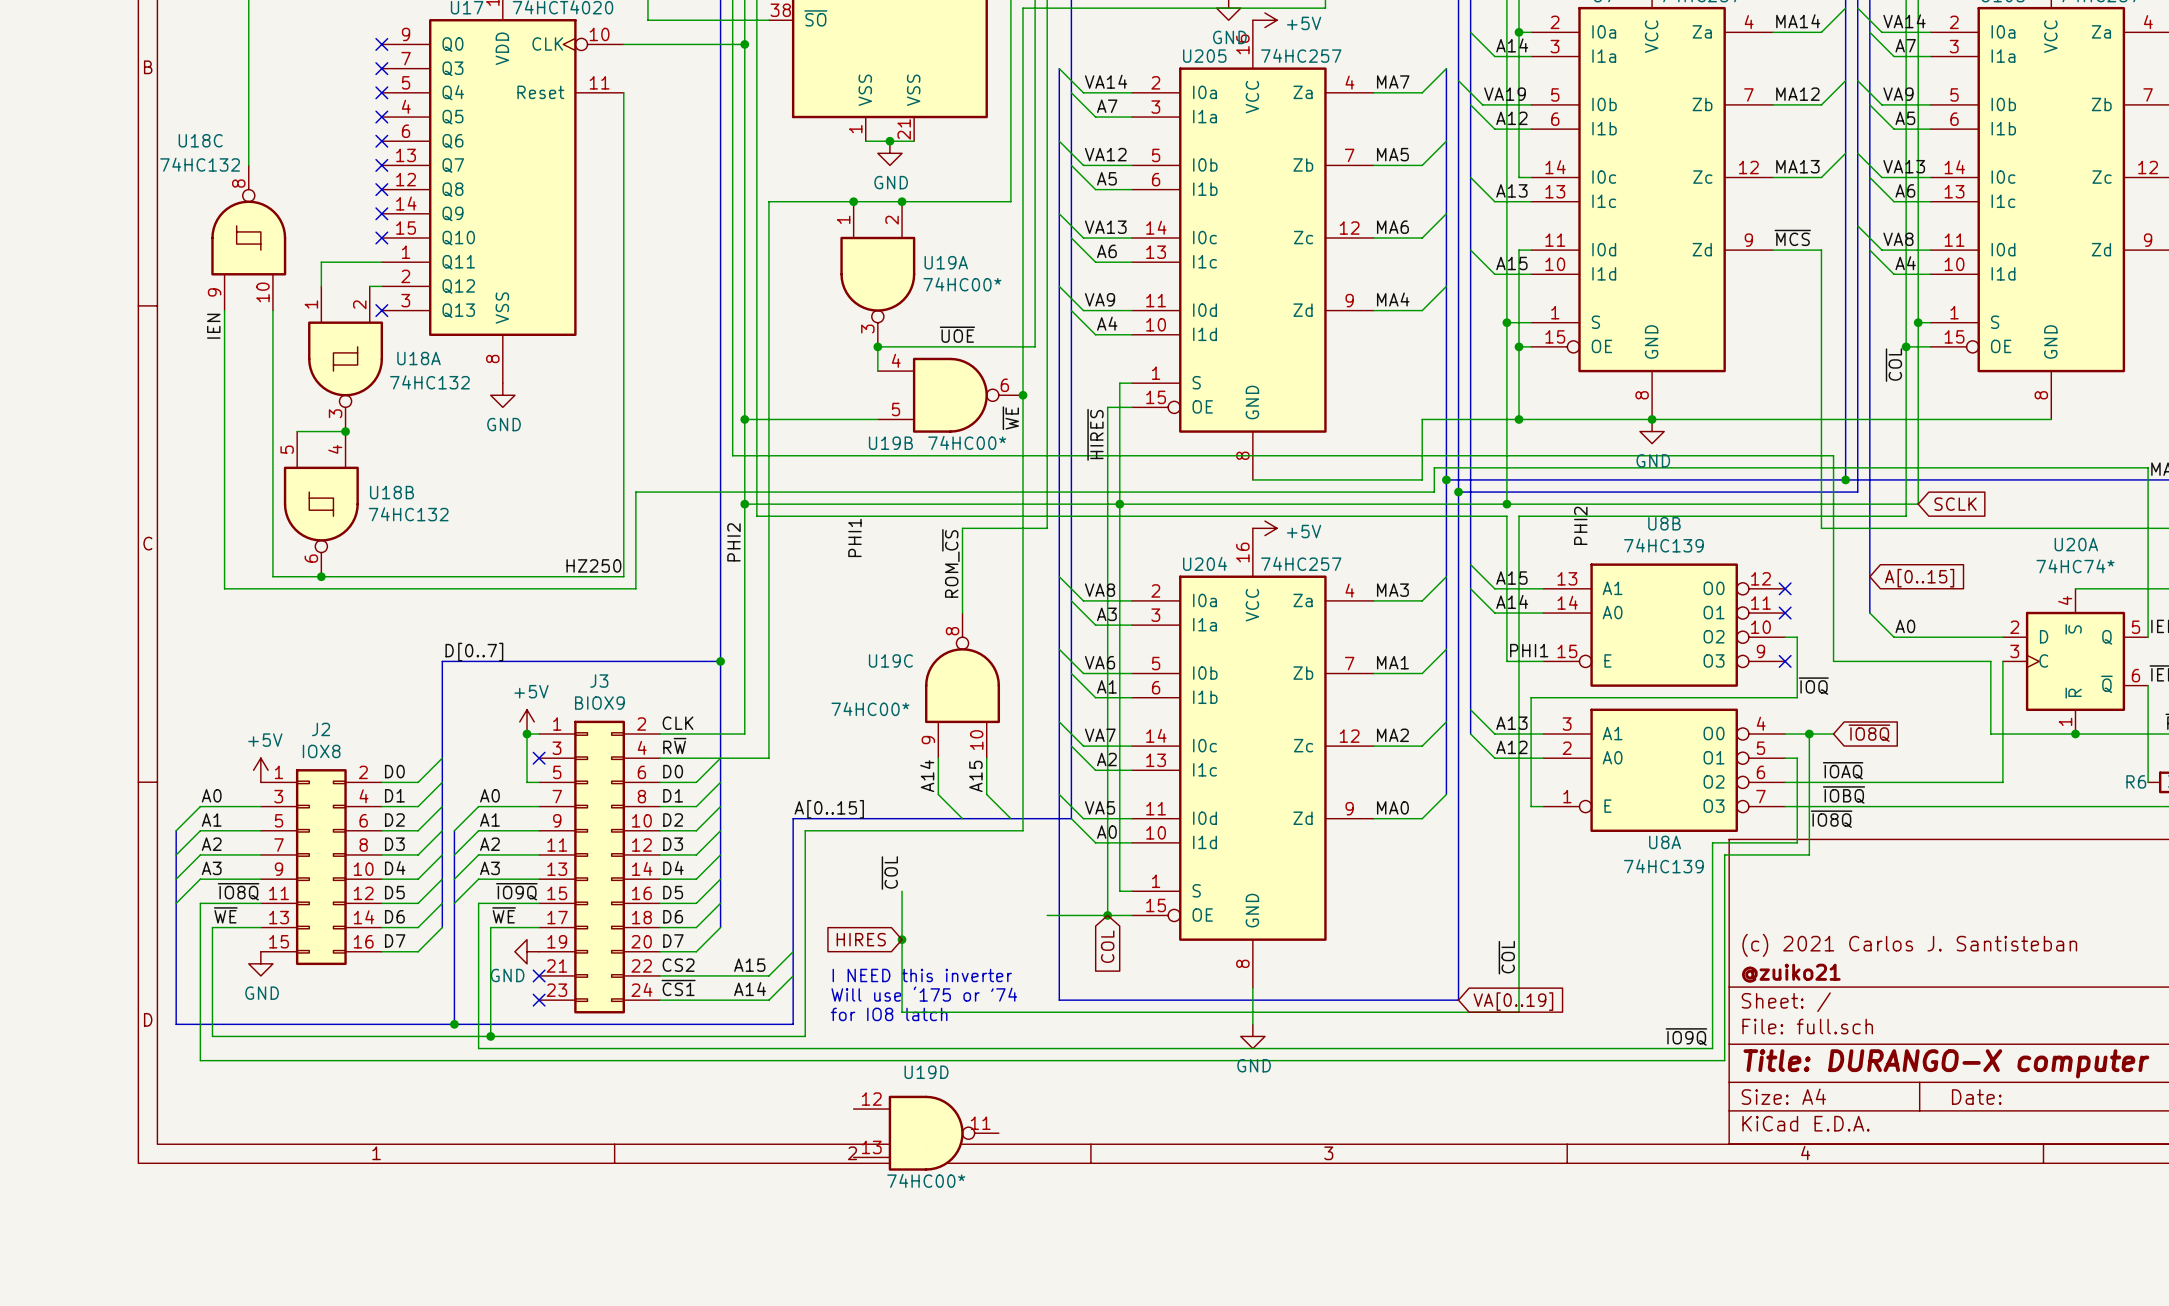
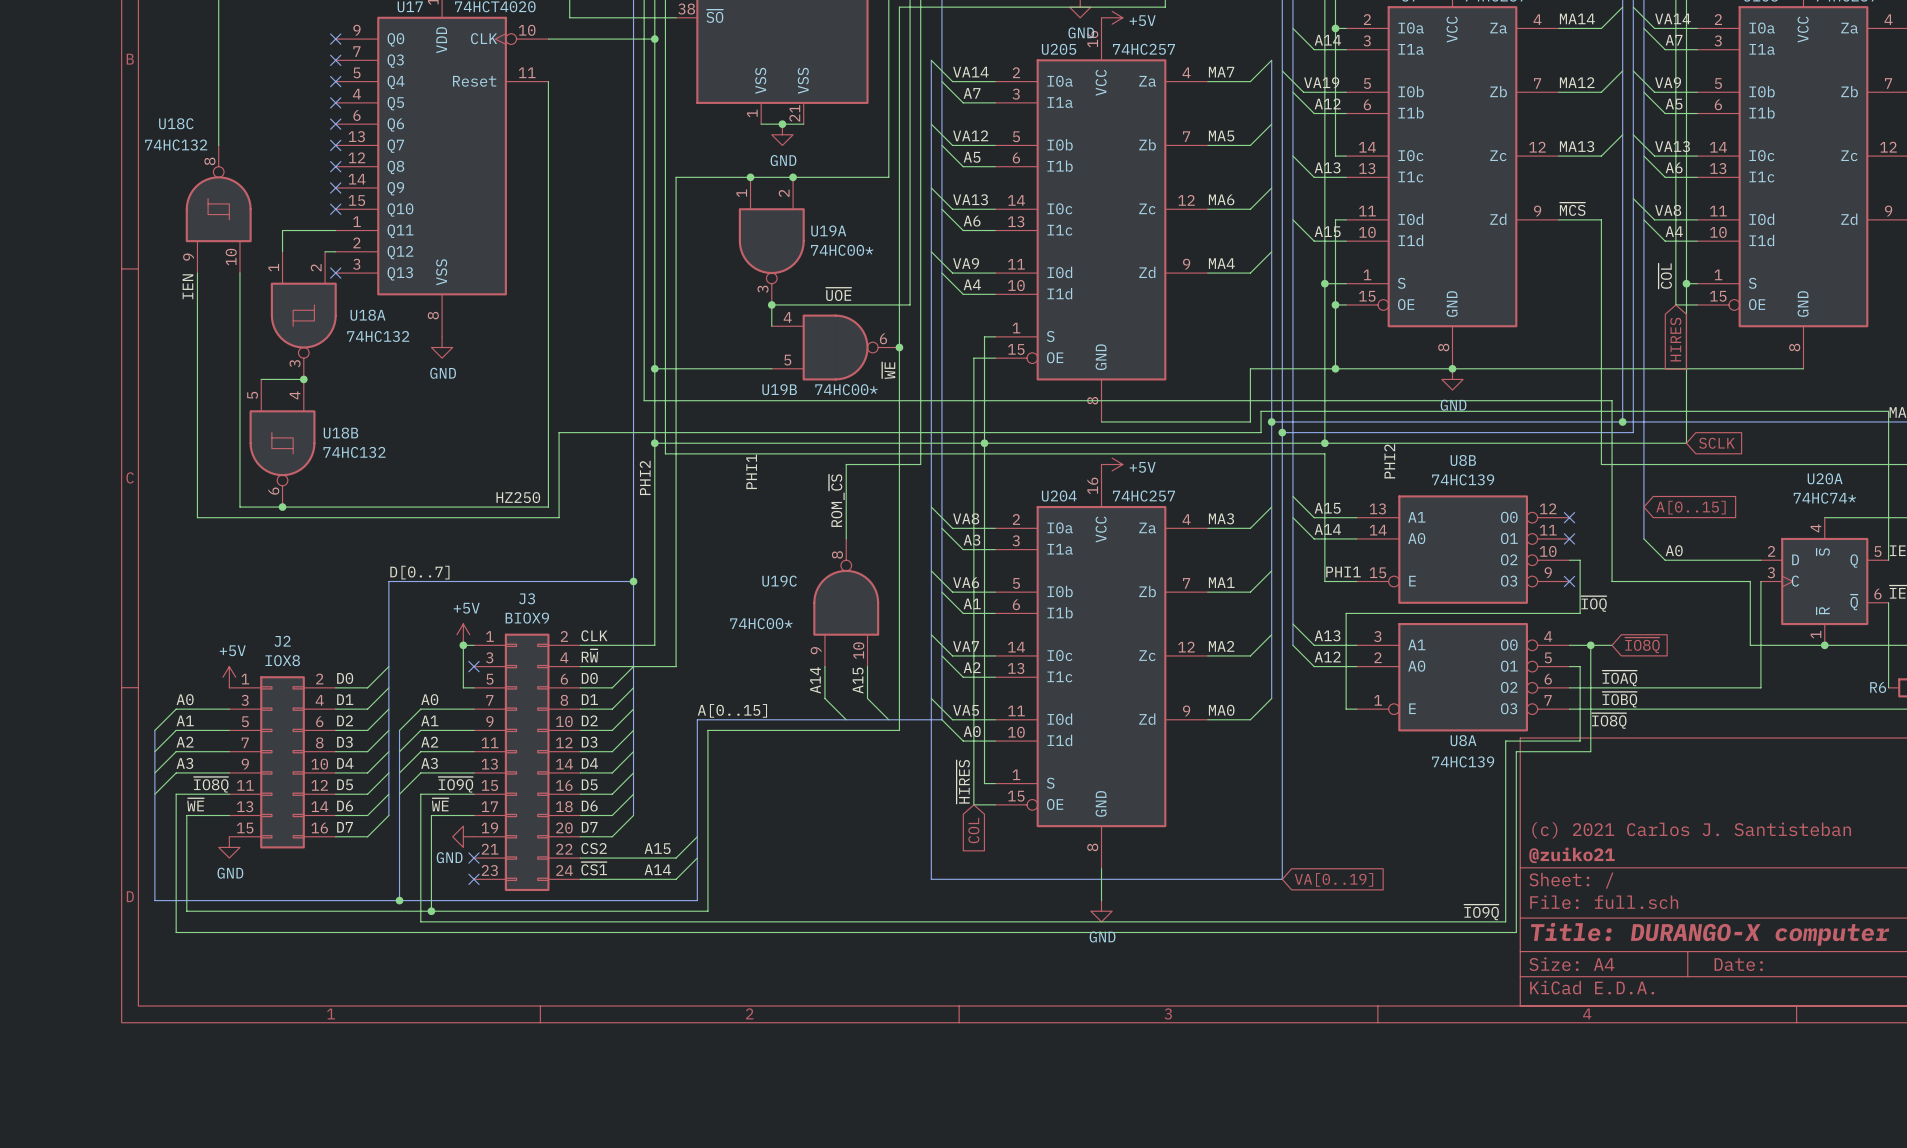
wire: (1906, 346) (1906, 516) (1519, 516) (1519, 1012) (902, 1012) (902, 891) -> none
junction: (1906, 346) -> none
label position: ~{COL} (1893, 365) -> ~{COL} (1665, 276)
global label: none -> HIRES (1675, 339)
label: ~{HIRES} (1095, 434) -> none
label: ~{COL} (889, 873) -> none
label: none -> ~{HIRES} (963, 781)
wire: (1047, 915) (1107, 915) -> none
junction: (1107, 915) -> none
global label: HIRES (861, 939) -> none
junction: (902, 939) -> none
label: ~{COL} (1506, 957) -> none
text: I NEED this inverter (922, 975) -> none
text: Will use ‘175 or ’74 (924, 994) -> none
text: for IO8 latch (889, 1014) -> none
U19D: 74HC00* (926, 1133) -> none

